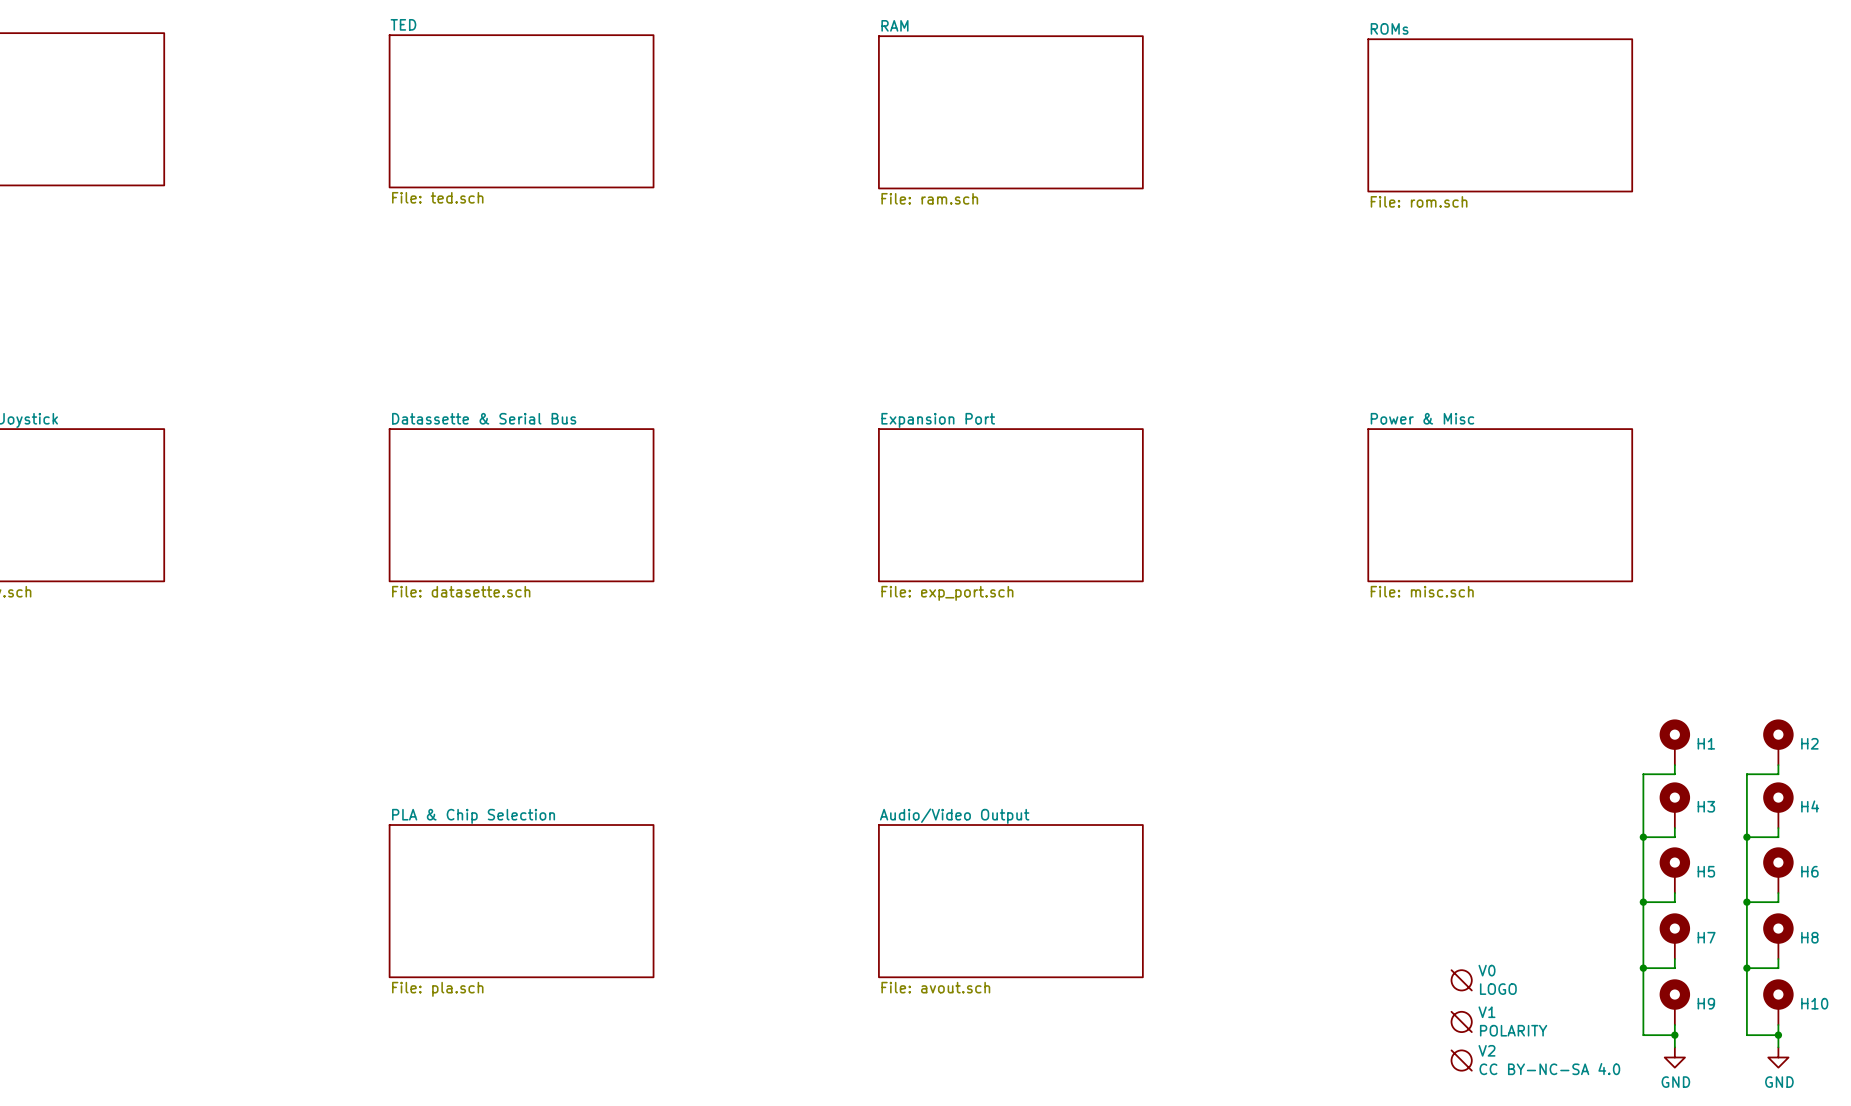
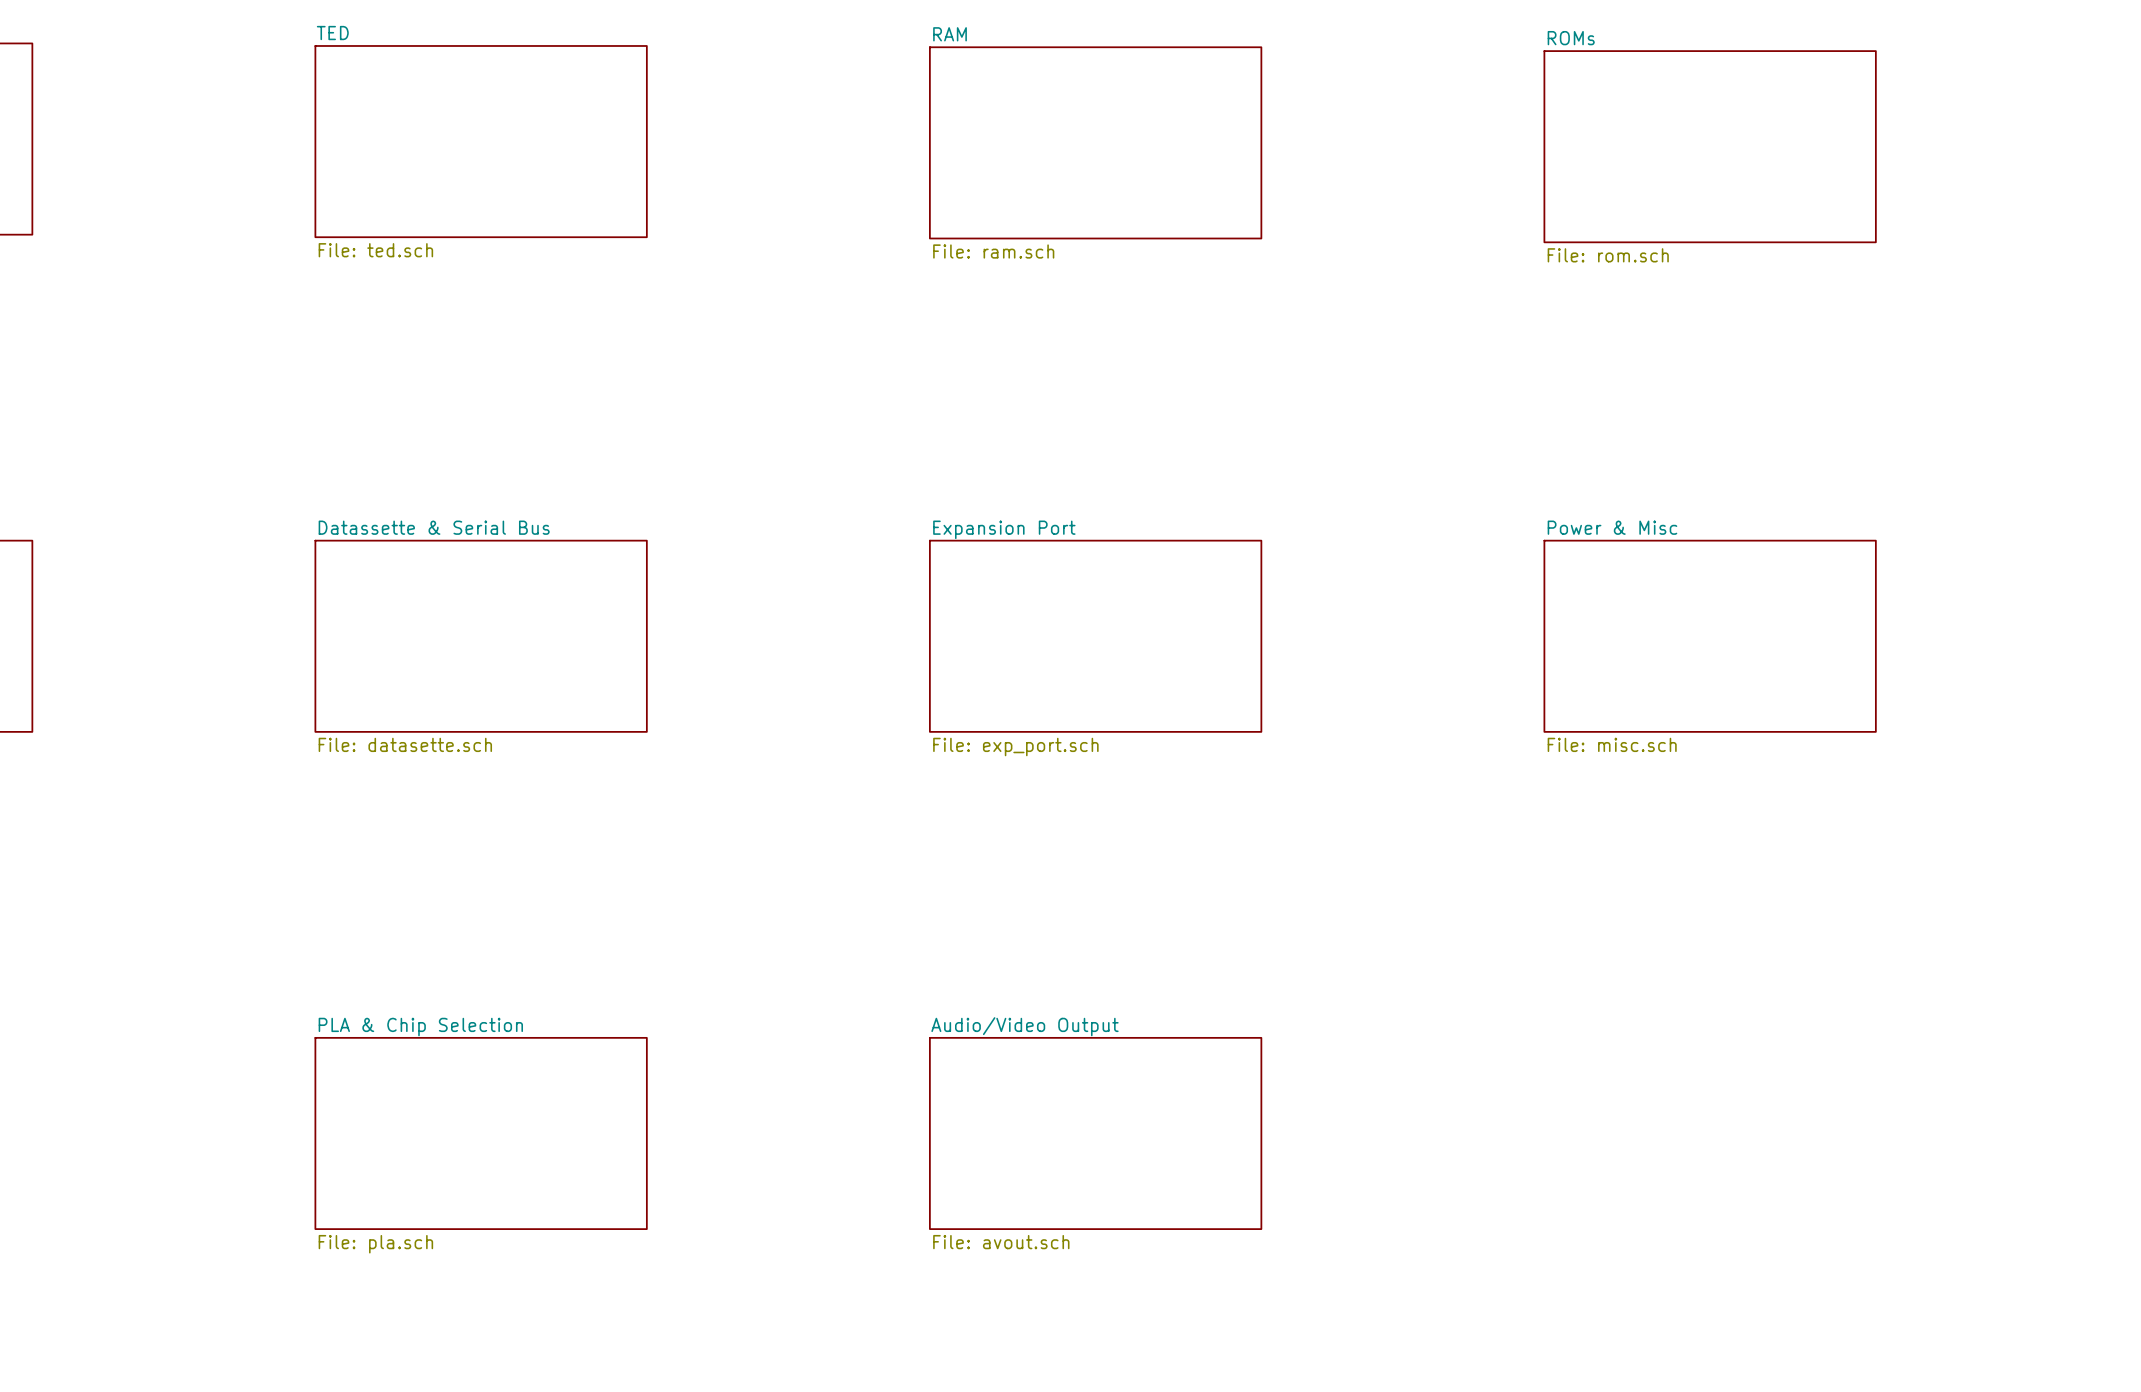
H1: (1674, 742) -> none
H2: (1778, 742) -> none
wire: (1674, 765) (1674, 774) (1643, 774) (1643, 1035) (1674, 1035) -> none
wire: (1778, 765) (1778, 774) (1746, 774) (1746, 1035) (1778, 1035) -> none
H3: (1674, 805) -> none
H4: (1778, 805) -> none
wire: (1674, 828) (1674, 837) (1643, 837) -> none
wire: (1778, 828) (1778, 837) (1746, 837) -> none
junction: (1643, 837) -> none
junction: (1746, 837) -> none
H5: (1674, 870) -> none
H6: (1778, 870) -> none
wire: (1674, 893) (1674, 902) (1643, 902) -> none
wire: (1778, 893) (1778, 902) (1746, 902) -> none
junction: (1643, 902) -> none
junction: (1746, 902) -> none
H7: (1674, 936) -> none
H8: (1778, 936) -> none
wire: (1674, 959) (1674, 968) (1643, 968) -> none
wire: (1778, 959) (1778, 968) (1746, 968) -> none
junction: (1643, 968) -> none
junction: (1746, 968) -> none
V0: LOGO (1461, 980) -> none
H9: (1674, 1002) -> none
H10: (1778, 1002) -> none
V1: POLARITY (1461, 1021) -> none
wire: (1674, 1025) (1674, 1047) -> none
wire: (1778, 1025) (1778, 1047) -> none
junction: (1674, 1035) -> none
junction: (1778, 1035) -> none
power symbol: GND (1674, 1057) -> none
power symbol: GND (1778, 1057) -> none
V2: CC BY-NC-SA 4.0 (1461, 1060) -> none

